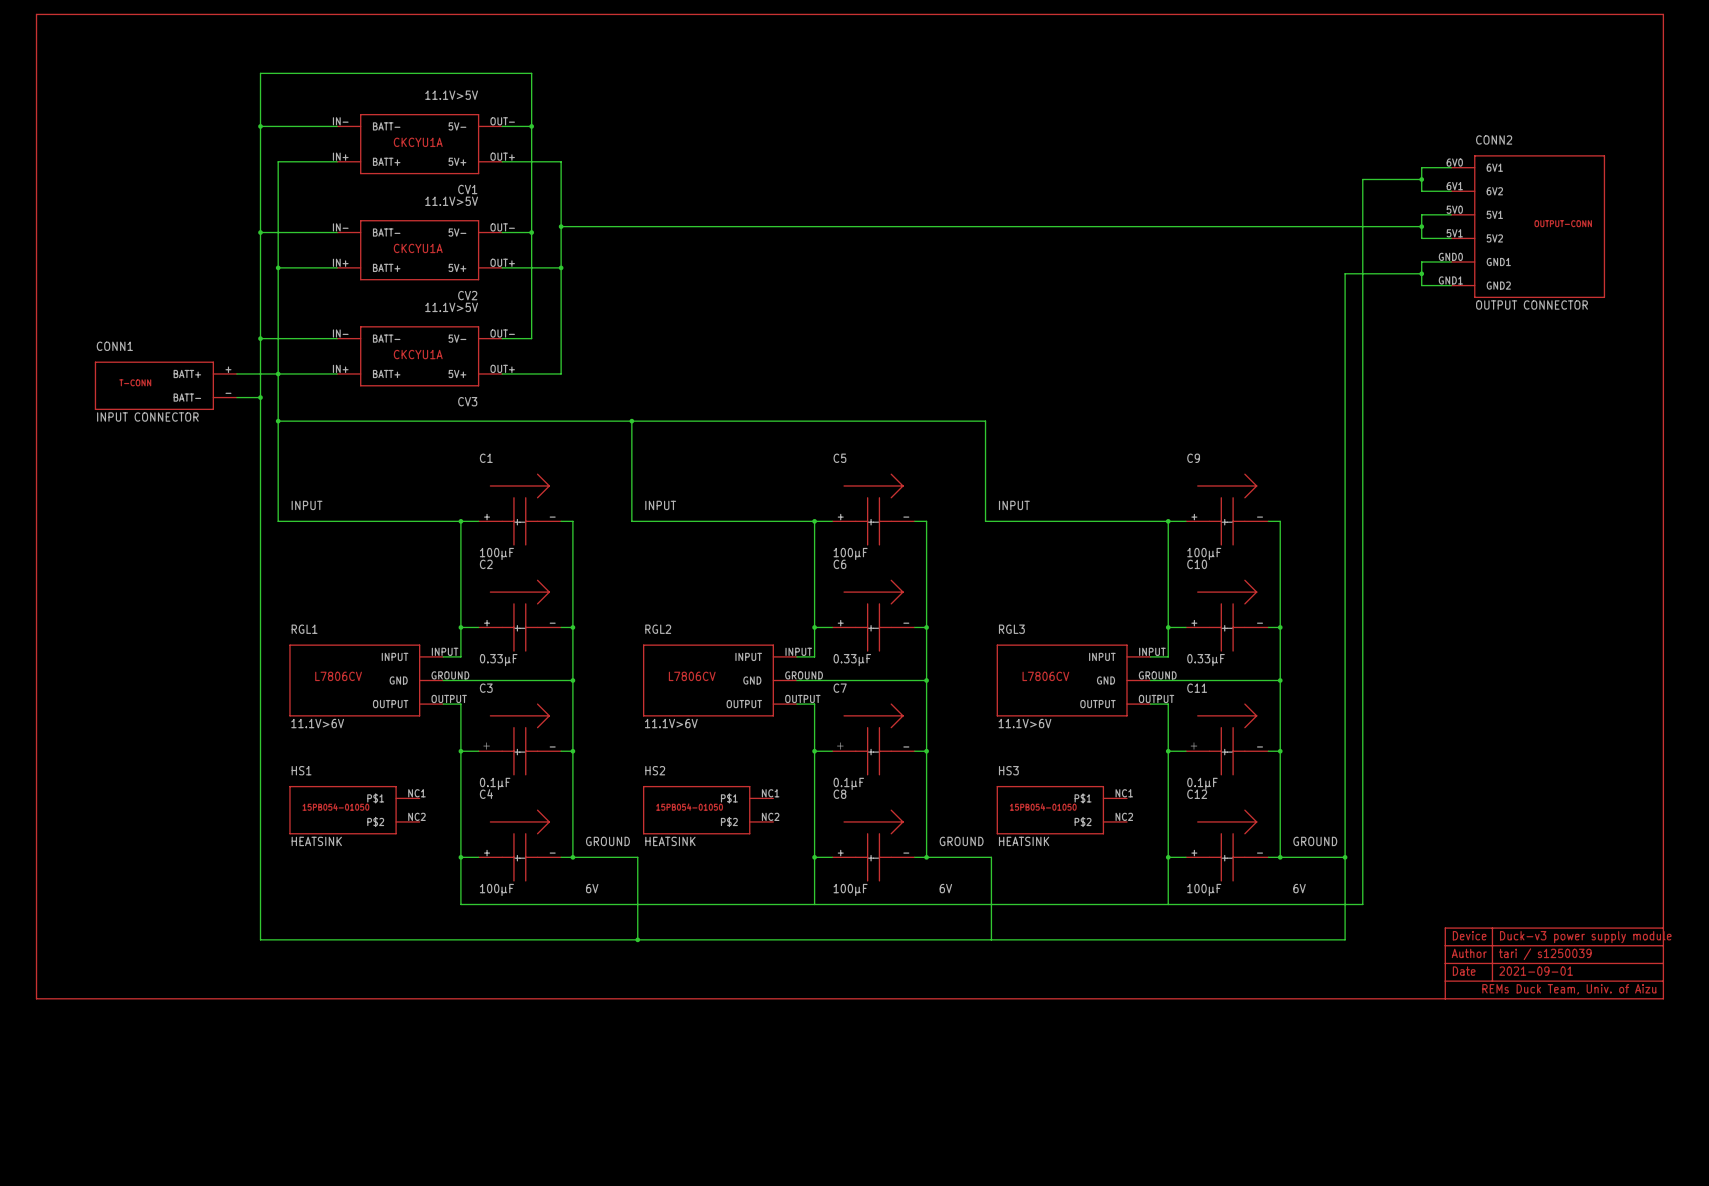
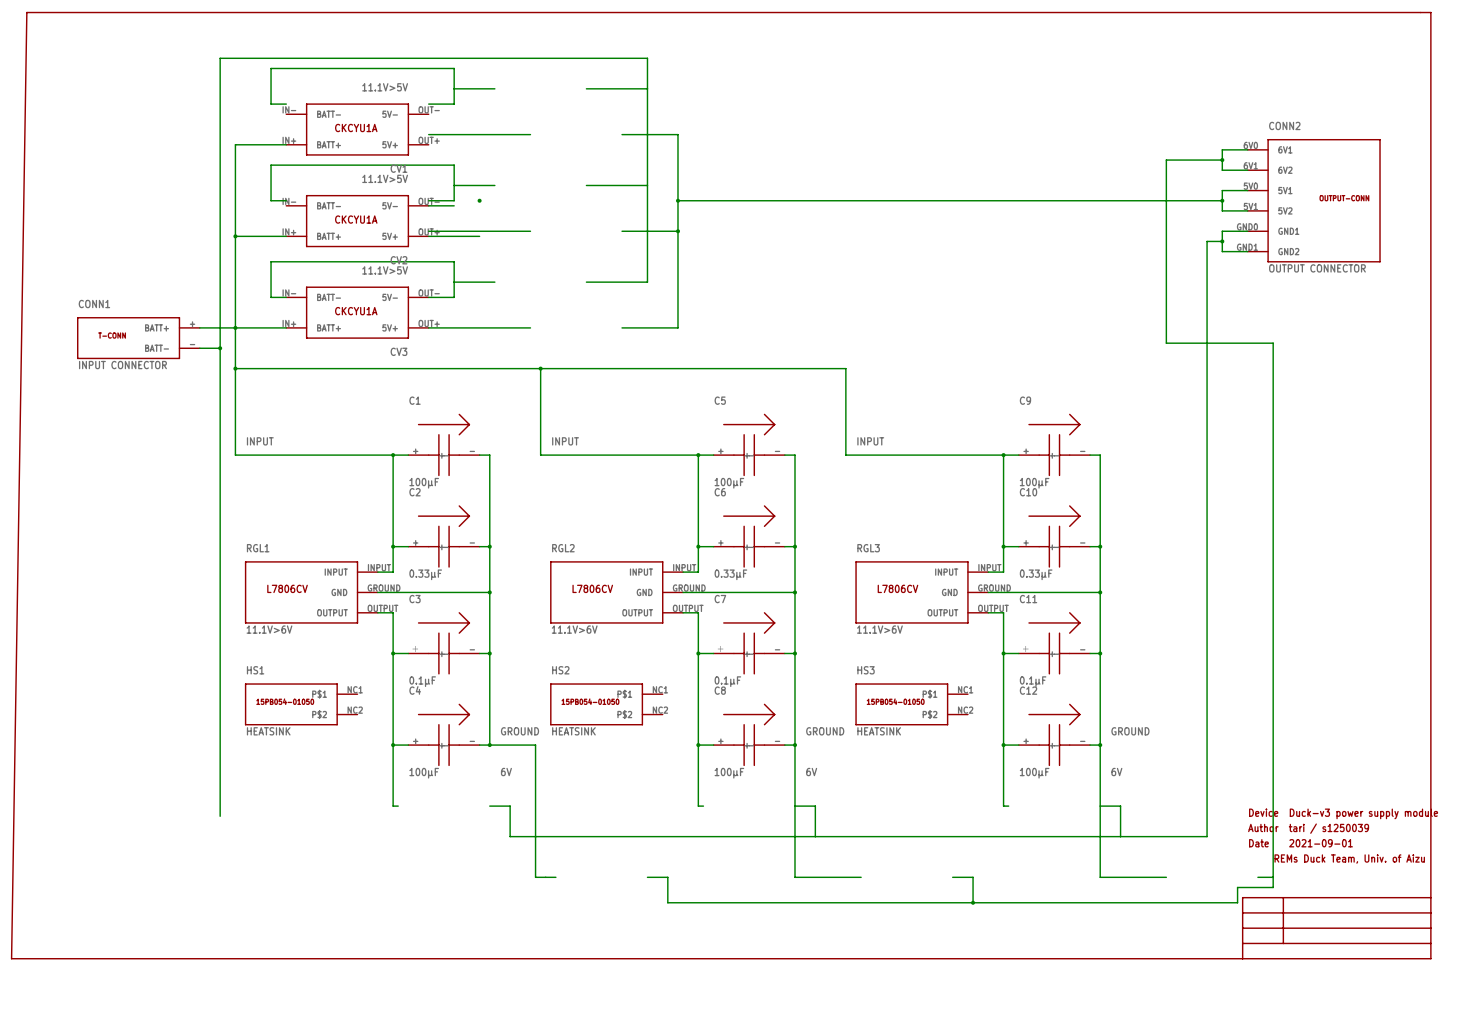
line: (1663, 14) (36, 14) (36, 998) (1663, 998) -> (1430, 17) (1430, 12) (26, 12) (11, 958) (1430, 958) (1430, 867)
wire: (260, 73) (319, 73) -> (286, 104) (271, 104) (271, 68)
wire: none -> (220, 68) (220, 58) (647, 58) (647, 282) (586, 282)
wire: none -> (454, 88) (494, 88)
wire: none -> (586, 88) (647, 88)
wire: (531, 114) (531, 185) -> (454, 104) (428, 104)
wire: (260, 126) (337, 126) -> none
junction: (260, 126) -> none
wire: (502, 126) (531, 126) -> none
junction: (531, 126) -> none
wire: none -> (428, 134) (530, 134)
wire: none -> (622, 134) (677, 134) (677, 327) (622, 327)
wire: (502, 161) (561, 161) (561, 373) -> (530, 327) (479, 327)
wire: (1362, 179) (1362, 904) (460, 904) -> (1171, 160) (1166, 160) (1166, 343) (1273, 343) (1273, 887) (1237, 887) (1237, 902) (667, 902) (667, 877) (647, 877)
wire: none -> (454, 165) (271, 165) (271, 200) (286, 200)
wire: none -> (454, 185) (494, 185)
wire: none -> (586, 185) (647, 185)
wire: (531, 226) (531, 297) -> (454, 200) (428, 200)
wire: (561, 226) (791, 226) -> none
junction: none -> (677, 200)
wire: (260, 232) (337, 232) -> none
junction: (260, 232) -> none
junction: (531, 232) -> none
wire: none -> (428, 231) (530, 231)
wire: none -> (622, 231) (677, 231)
junction: none -> (677, 231)
junction: (561, 267) -> none
wire: (1404, 273) (1345, 273) (1345, 939) (260, 939) -> (1207, 241) (1207, 836) (510, 836) (510, 806) (489, 806)
wire: none -> (454, 282) (494, 282)
wire: (260, 338) (319, 338) -> (454, 261) (271, 261) (271, 297)
junction: (260, 338) -> none
wire: (625, 857) (637, 857) (637, 939) -> (535, 745) (535, 877) (555, 877)
wire: (926, 857) (991, 857) (991, 939) -> (794, 745) (794, 877) (861, 877)
wire: (1280, 857) (1345, 857) -> (1100, 745) (1100, 877) (1166, 877)
junction: (1345, 857) -> none
wire: none -> (393, 785) (393, 806) (398, 806)
wire: none -> (698, 785) (698, 806) (703, 806)
wire: none -> (1003, 785) (1003, 806) (1008, 806)
wire: none -> (794, 806) (815, 806) (815, 836)
wire: none -> (1100, 806) (1120, 806) (1120, 836)
line: (1492, 928) (1492, 981) -> (1283, 897) (1283, 943)
line: (1663, 928) (1445, 928) (1445, 998) -> (1430, 897) (1242, 897) (1242, 958)
junction: (637, 939) -> none
line: (1445, 945) (1663, 945) -> (1242, 912) (1430, 912)
line: (1445, 963) (1663, 963) -> (1242, 928) (1430, 928)
line: (1445, 981) (1663, 981) -> (1242, 943) (1430, 943)
wire: none -> (952, 877) (973, 877) (973, 902)
wire: none -> (1257, 877) (1273, 877)
junction: none -> (973, 902)

